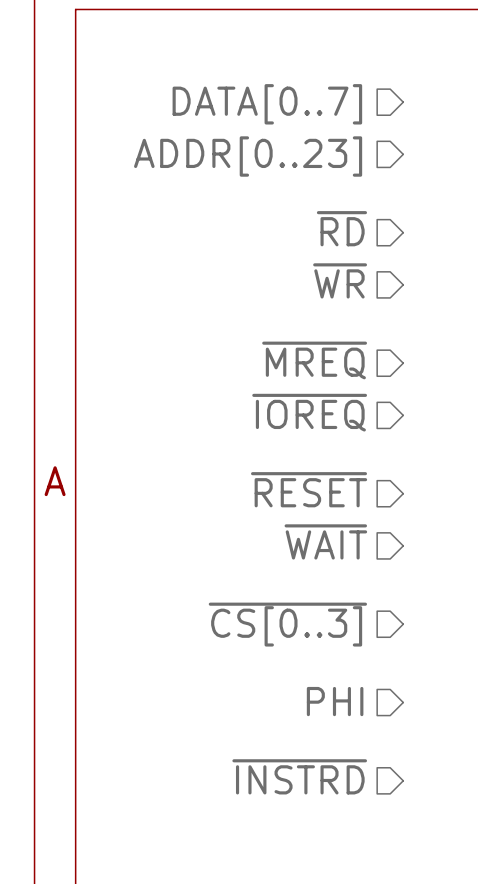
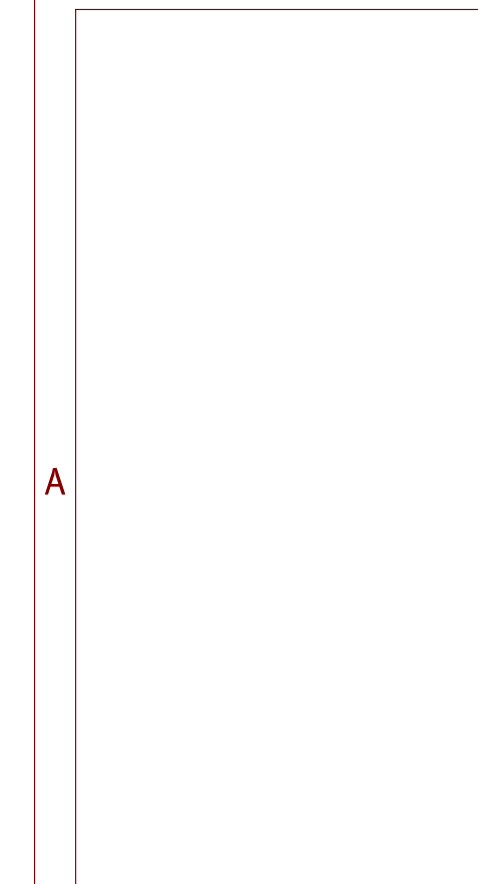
hierarchical label: DATA[0..7] (267, 104) -> none
hierarchical label: ADDR[0..23] (248, 156) -> none
hierarchical label: ~{RD} (341, 228) -> none
hierarchical label: ~{WR} (340, 280) -> none
hierarchical label: ~{MREQ} (314, 360) -> none
hierarchical label: ~{IOREQ} (309, 412) -> none
hierarchical label: ~{RESET} (309, 489) -> none
hierarchical label: ~{WAIT} (325, 541) -> none
hierarchical label: ~{CS[0..3]} (287, 624) -> none
hierarchical label: PHI (335, 701) -> none
hierarchical label: ~{INSTRD} (299, 776) -> none

